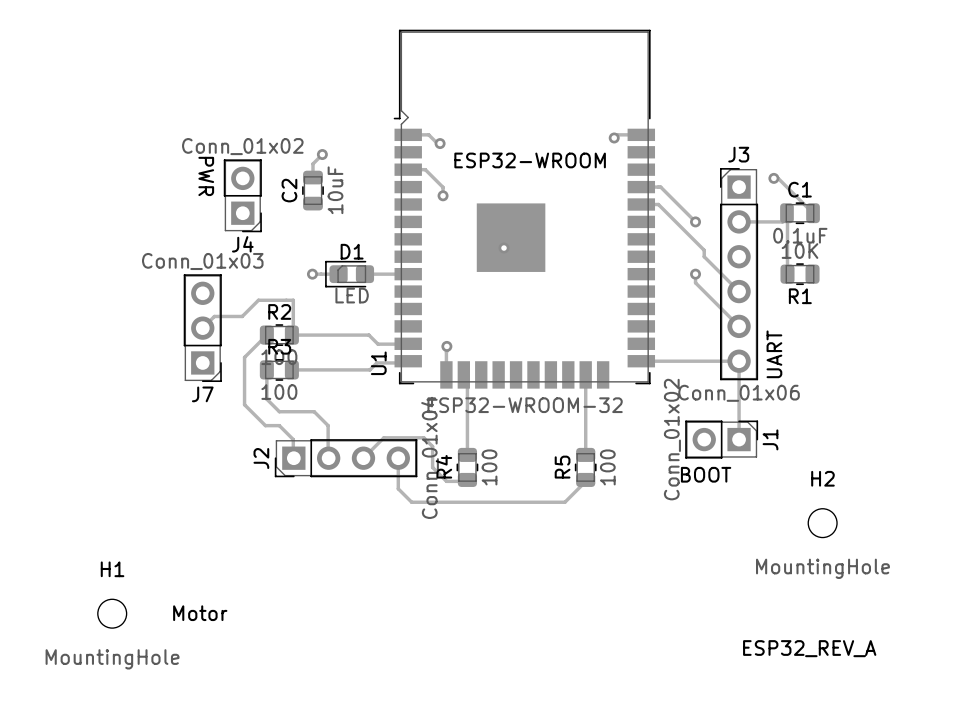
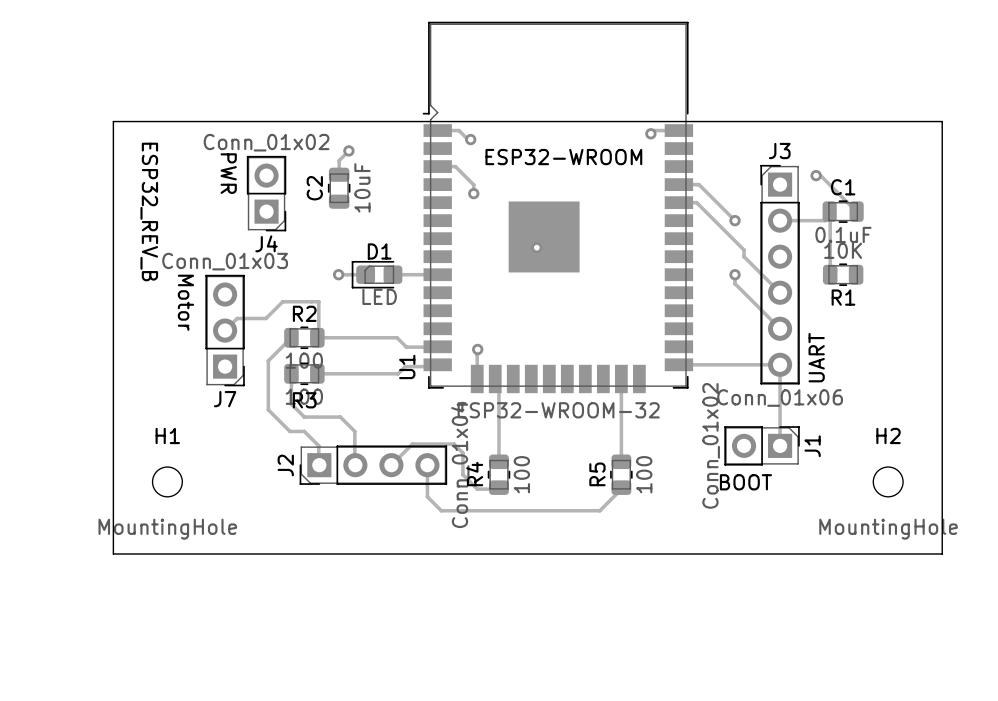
board edge: none -> (113, 121) (942, 121) (942, 553) (113, 553) (113, 121)
text: none -> ESP32_REV_B (149, 211)
R3 name position: R3 (279, 346) -> R3 (304, 400)
H2 position: (822, 523) -> (888, 481)
H1 position: (112, 613) -> (167, 481)
text rotation: 0° (200, 613) -> 90° clockwise (185, 302)
text position: Motor (200, 613) -> Motor (185, 302)
text: ESP32_REV_A (809, 648) -> none

